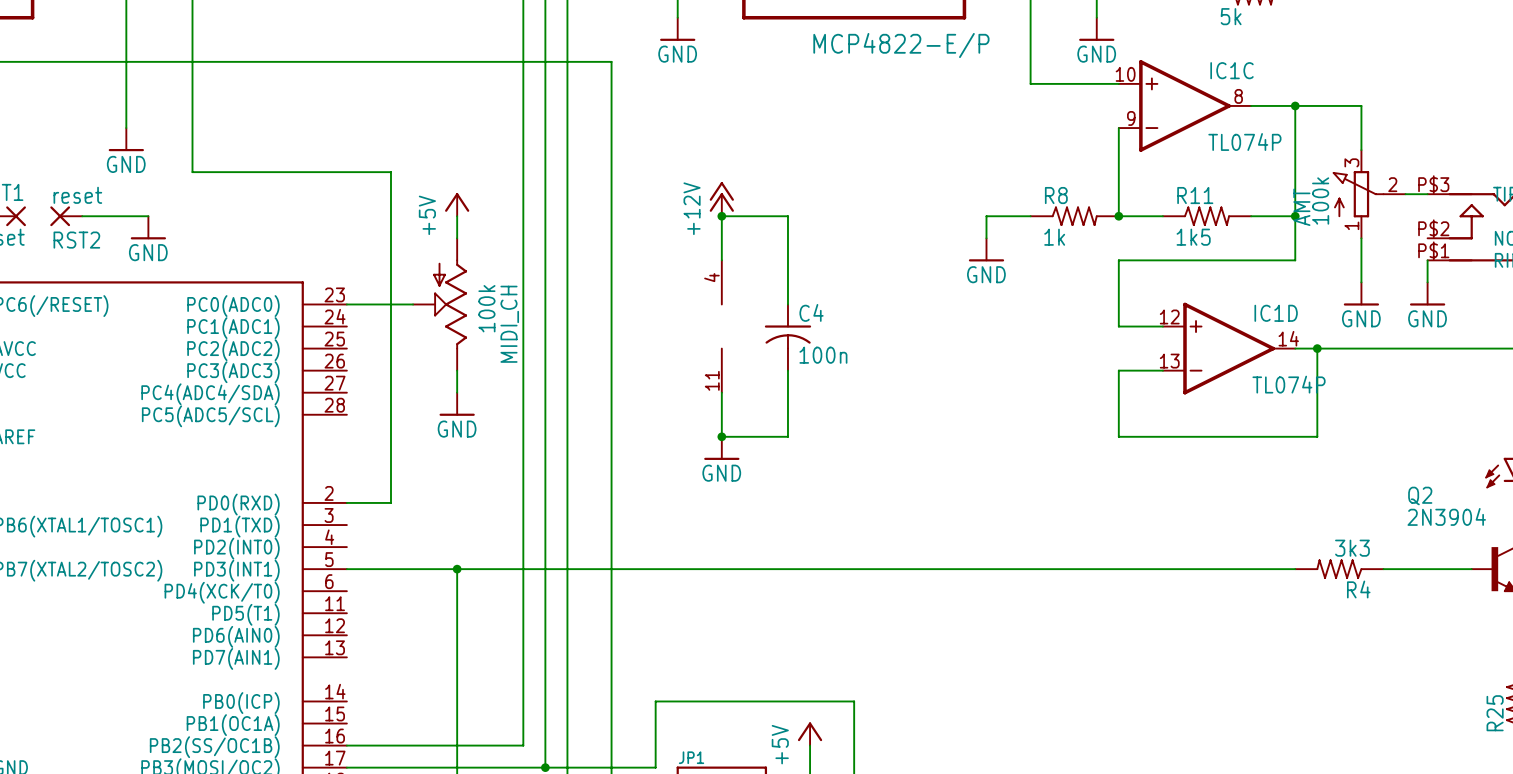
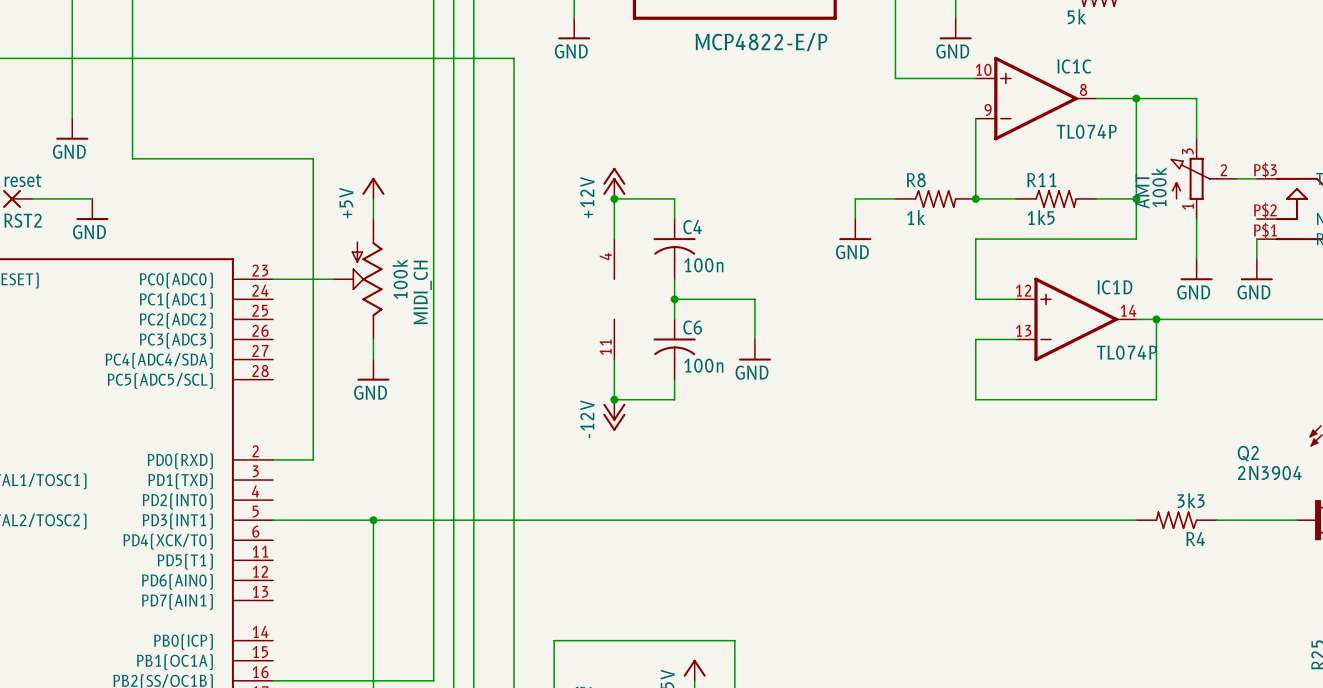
wire: none -> (674, 299) (754, 299) (754, 339)
junction: none -> (674, 299)
C4 position: (787, 337) -> (674, 249)
C6: none -> 100n (674, 349)
power symbol: none -> GND (754, 350)
power symbol: GND (721, 448) -> -12V (614, 415)

